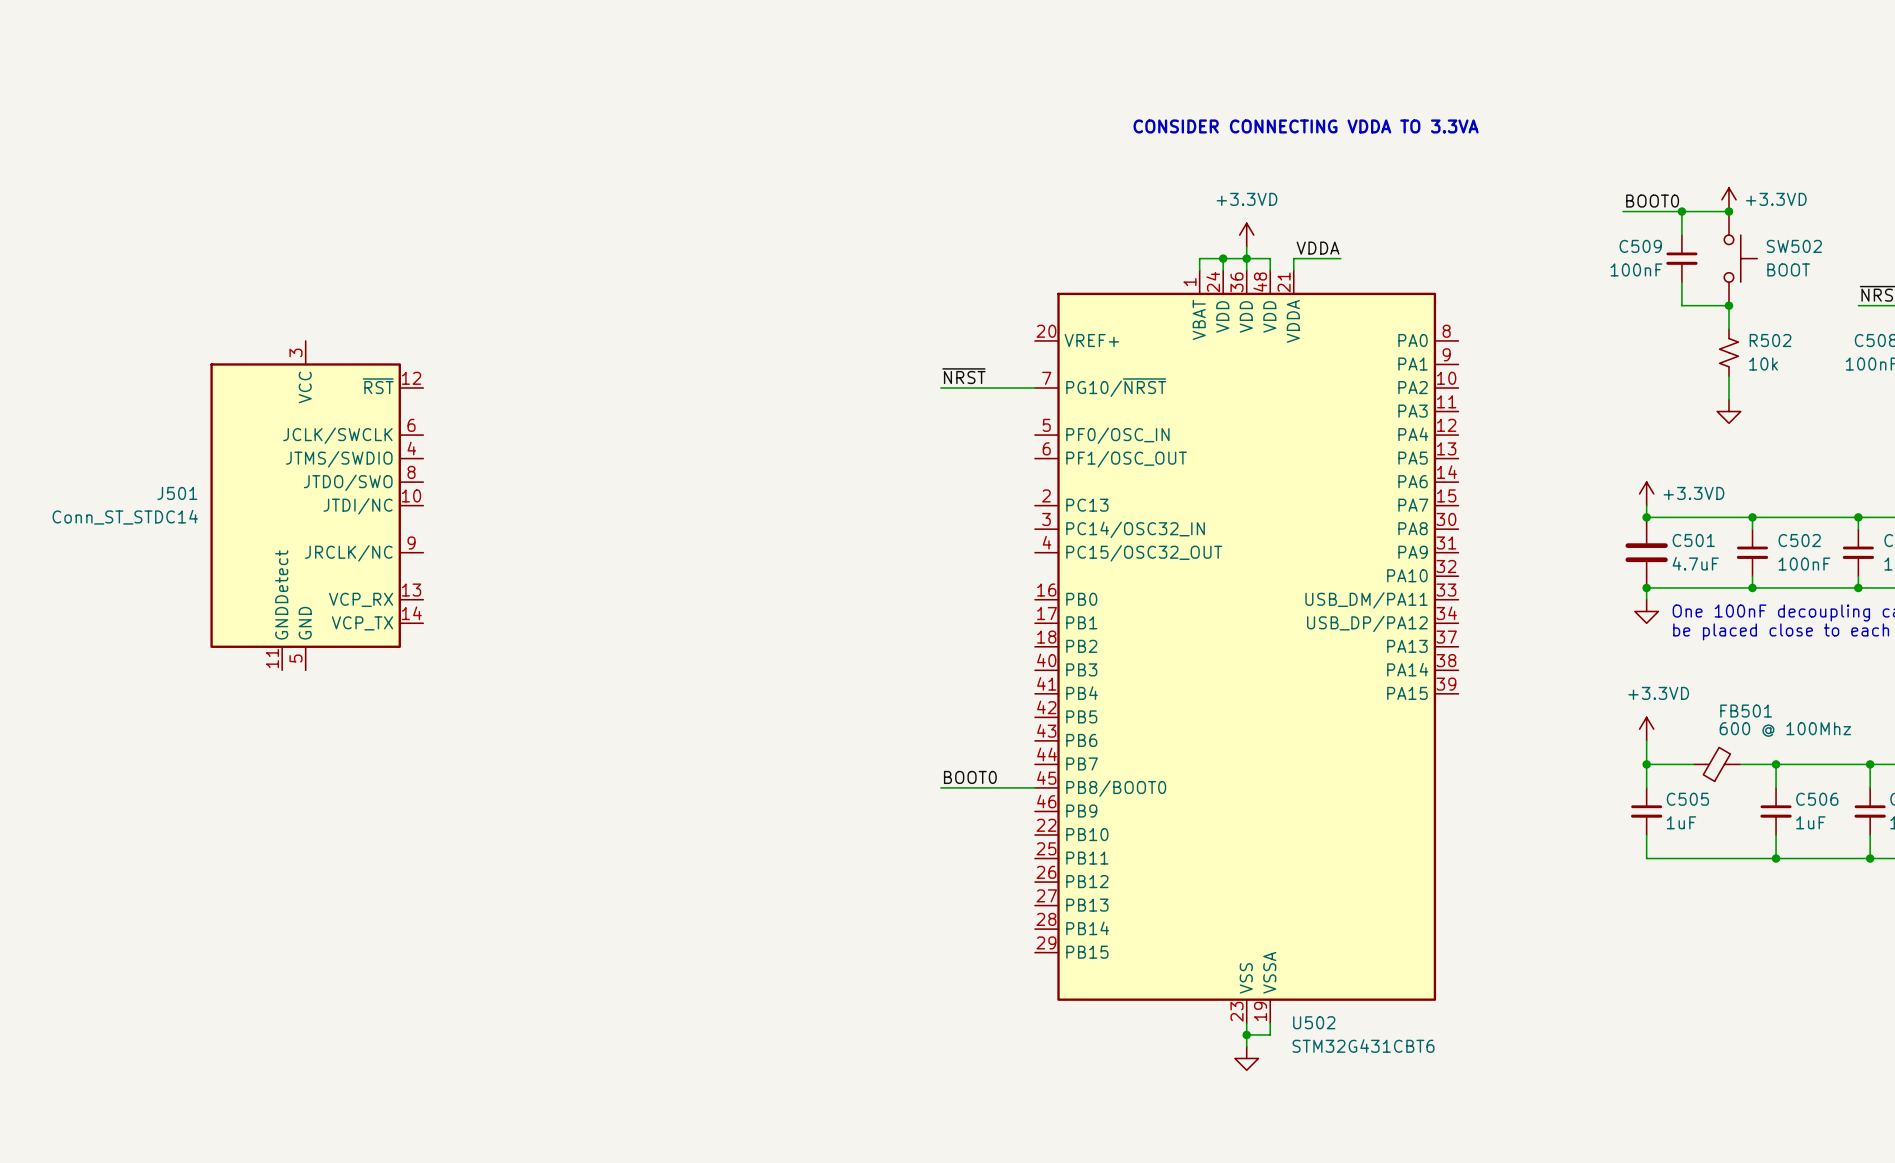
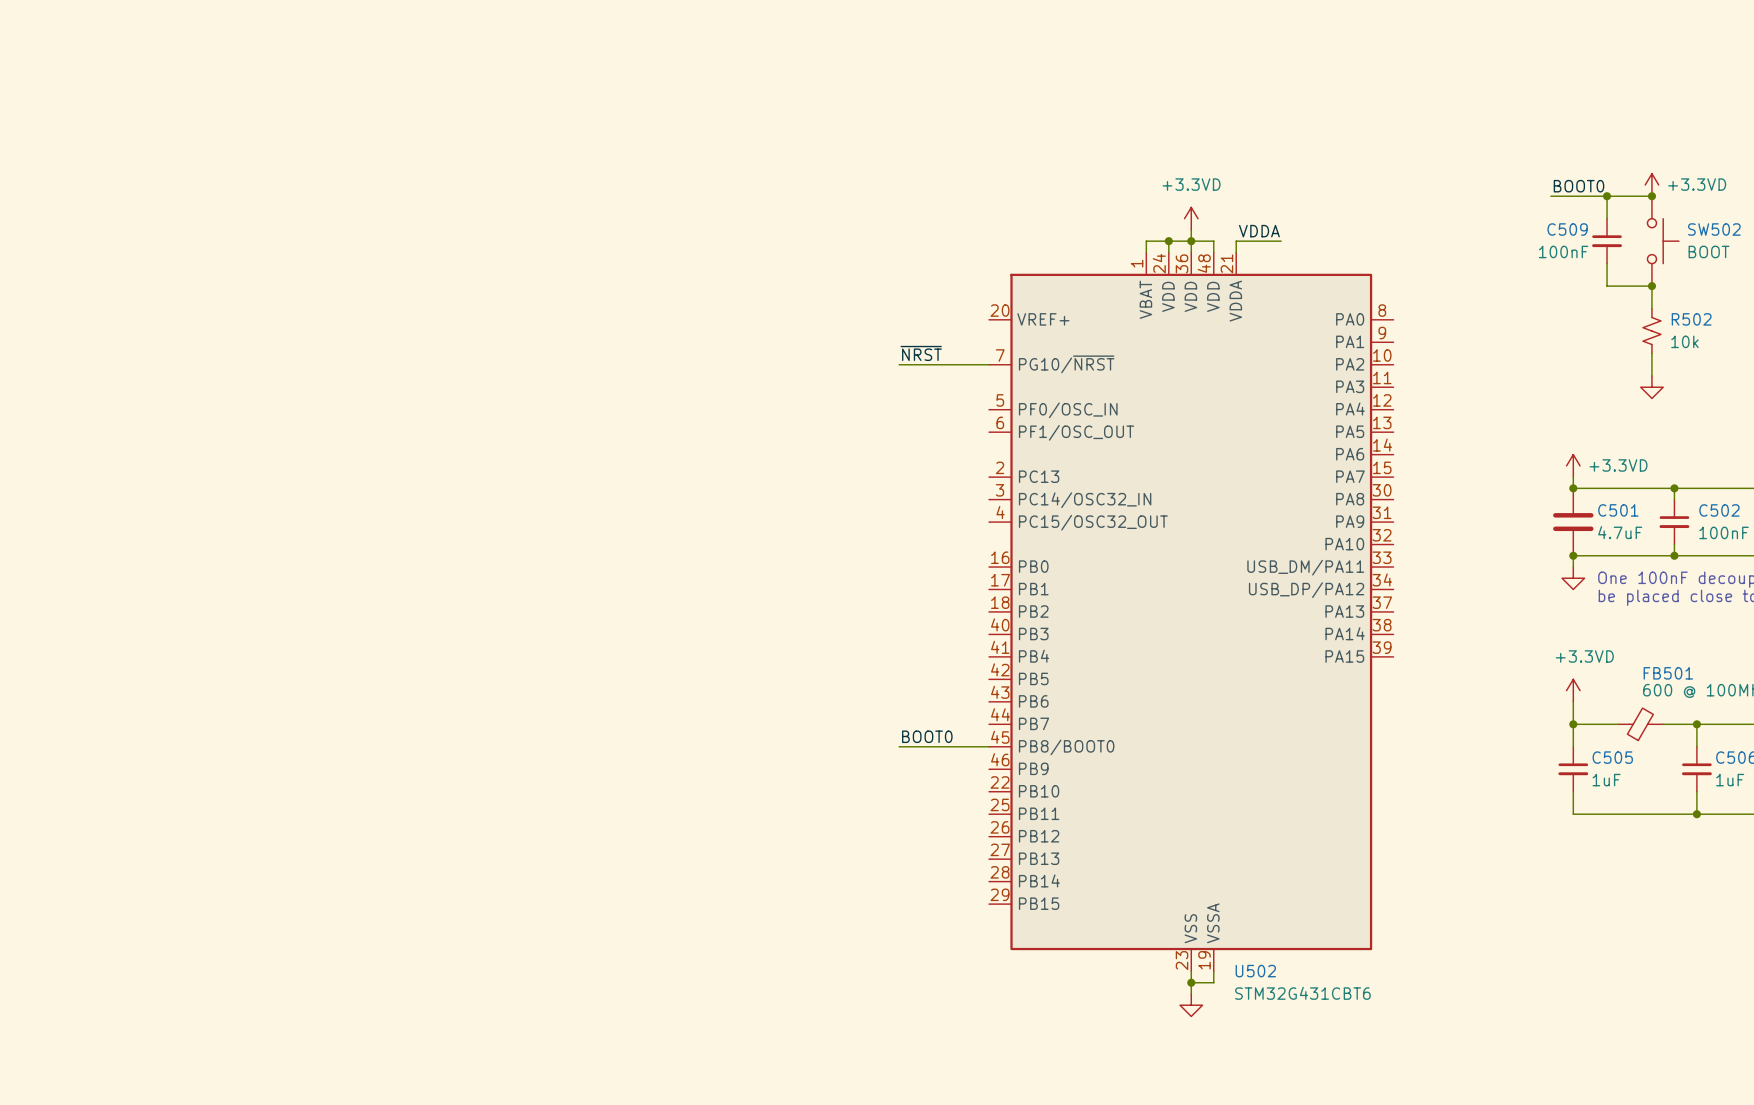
text: CONSIDER CONNECTING VDDA TO 3.3VA (1306, 126) -> none
J501: Conn_ST_STDC14 (316, 505) -> none

